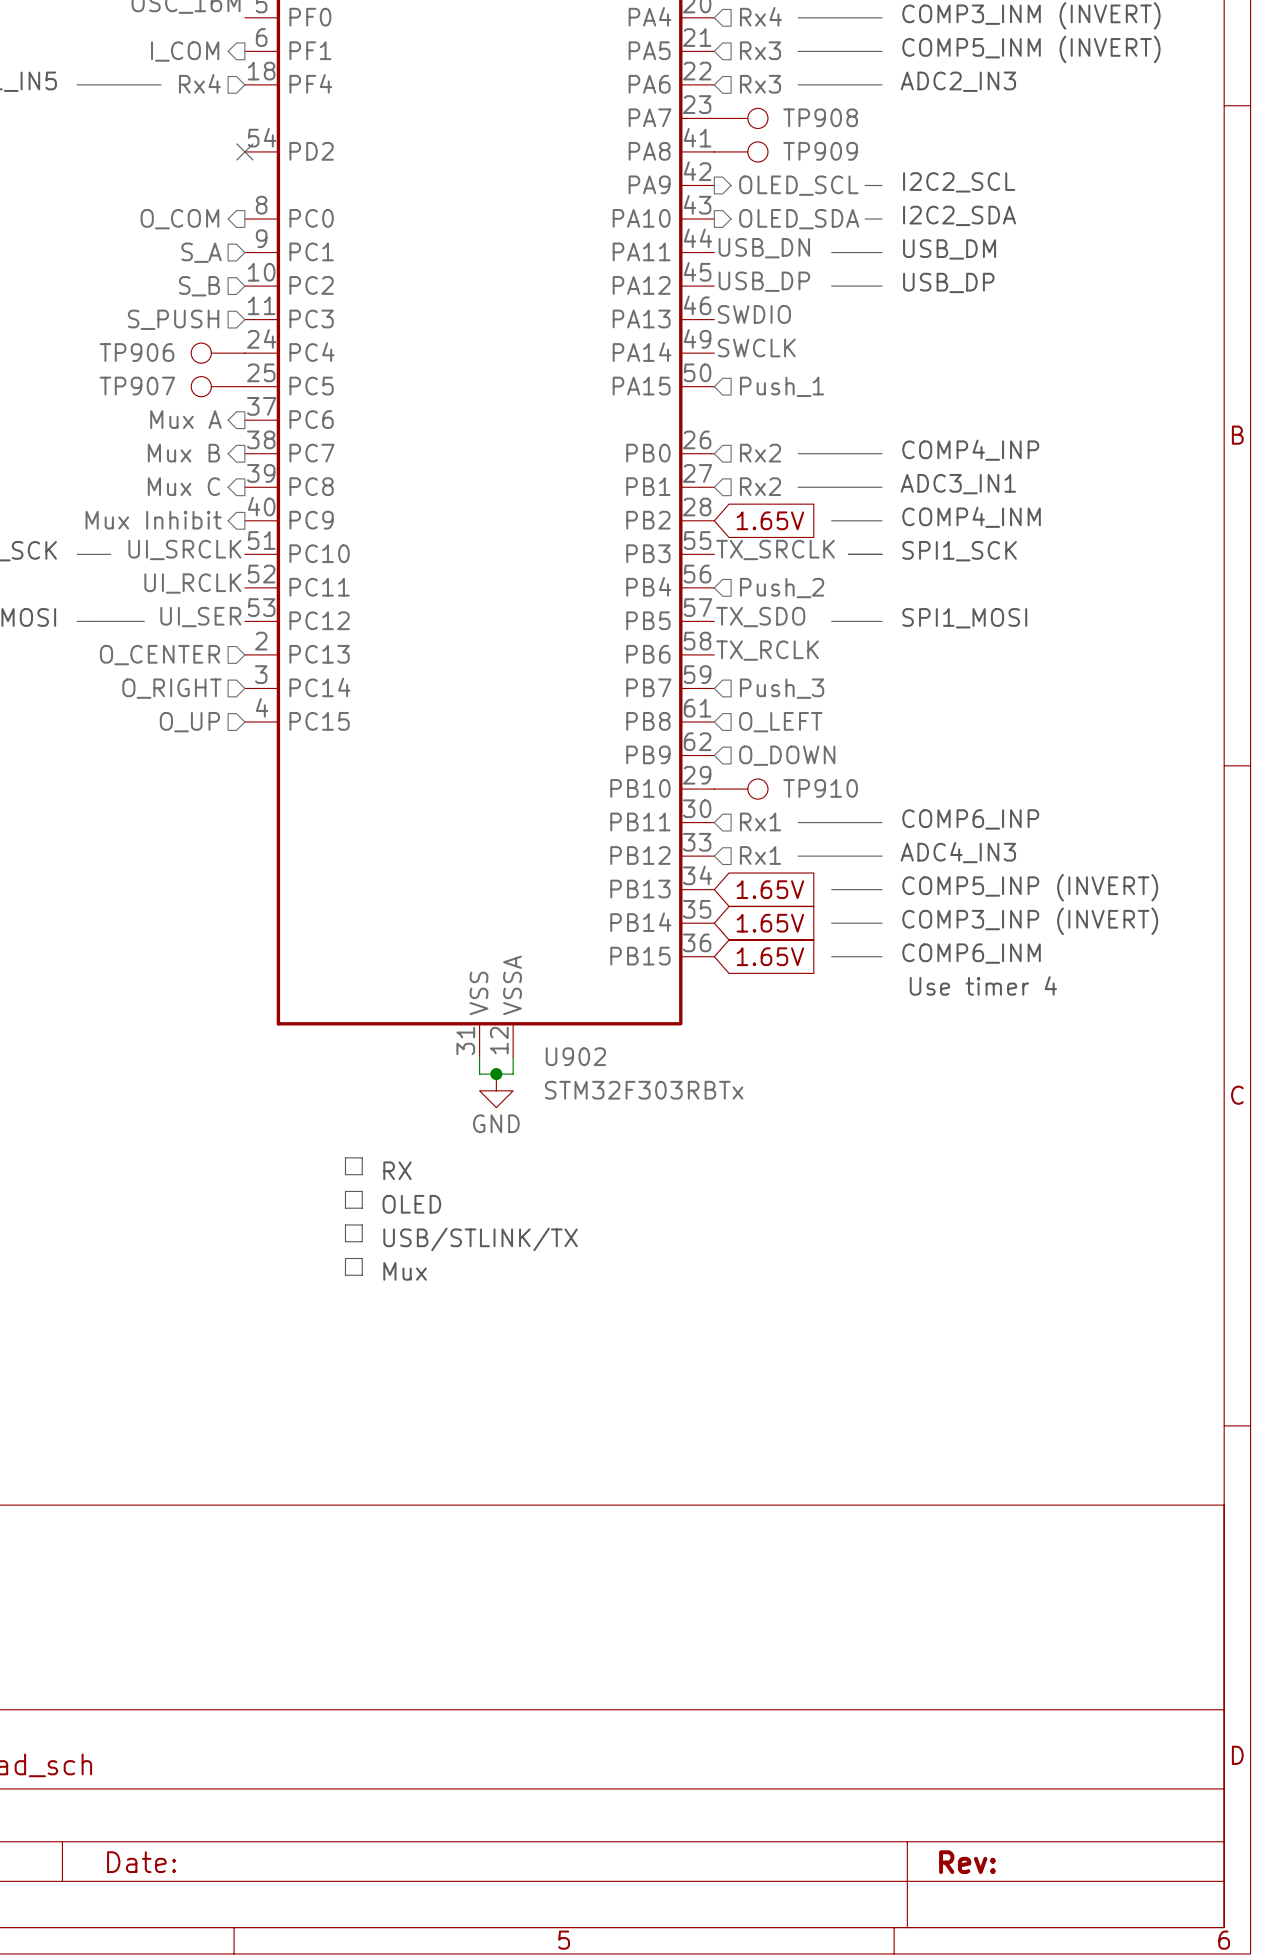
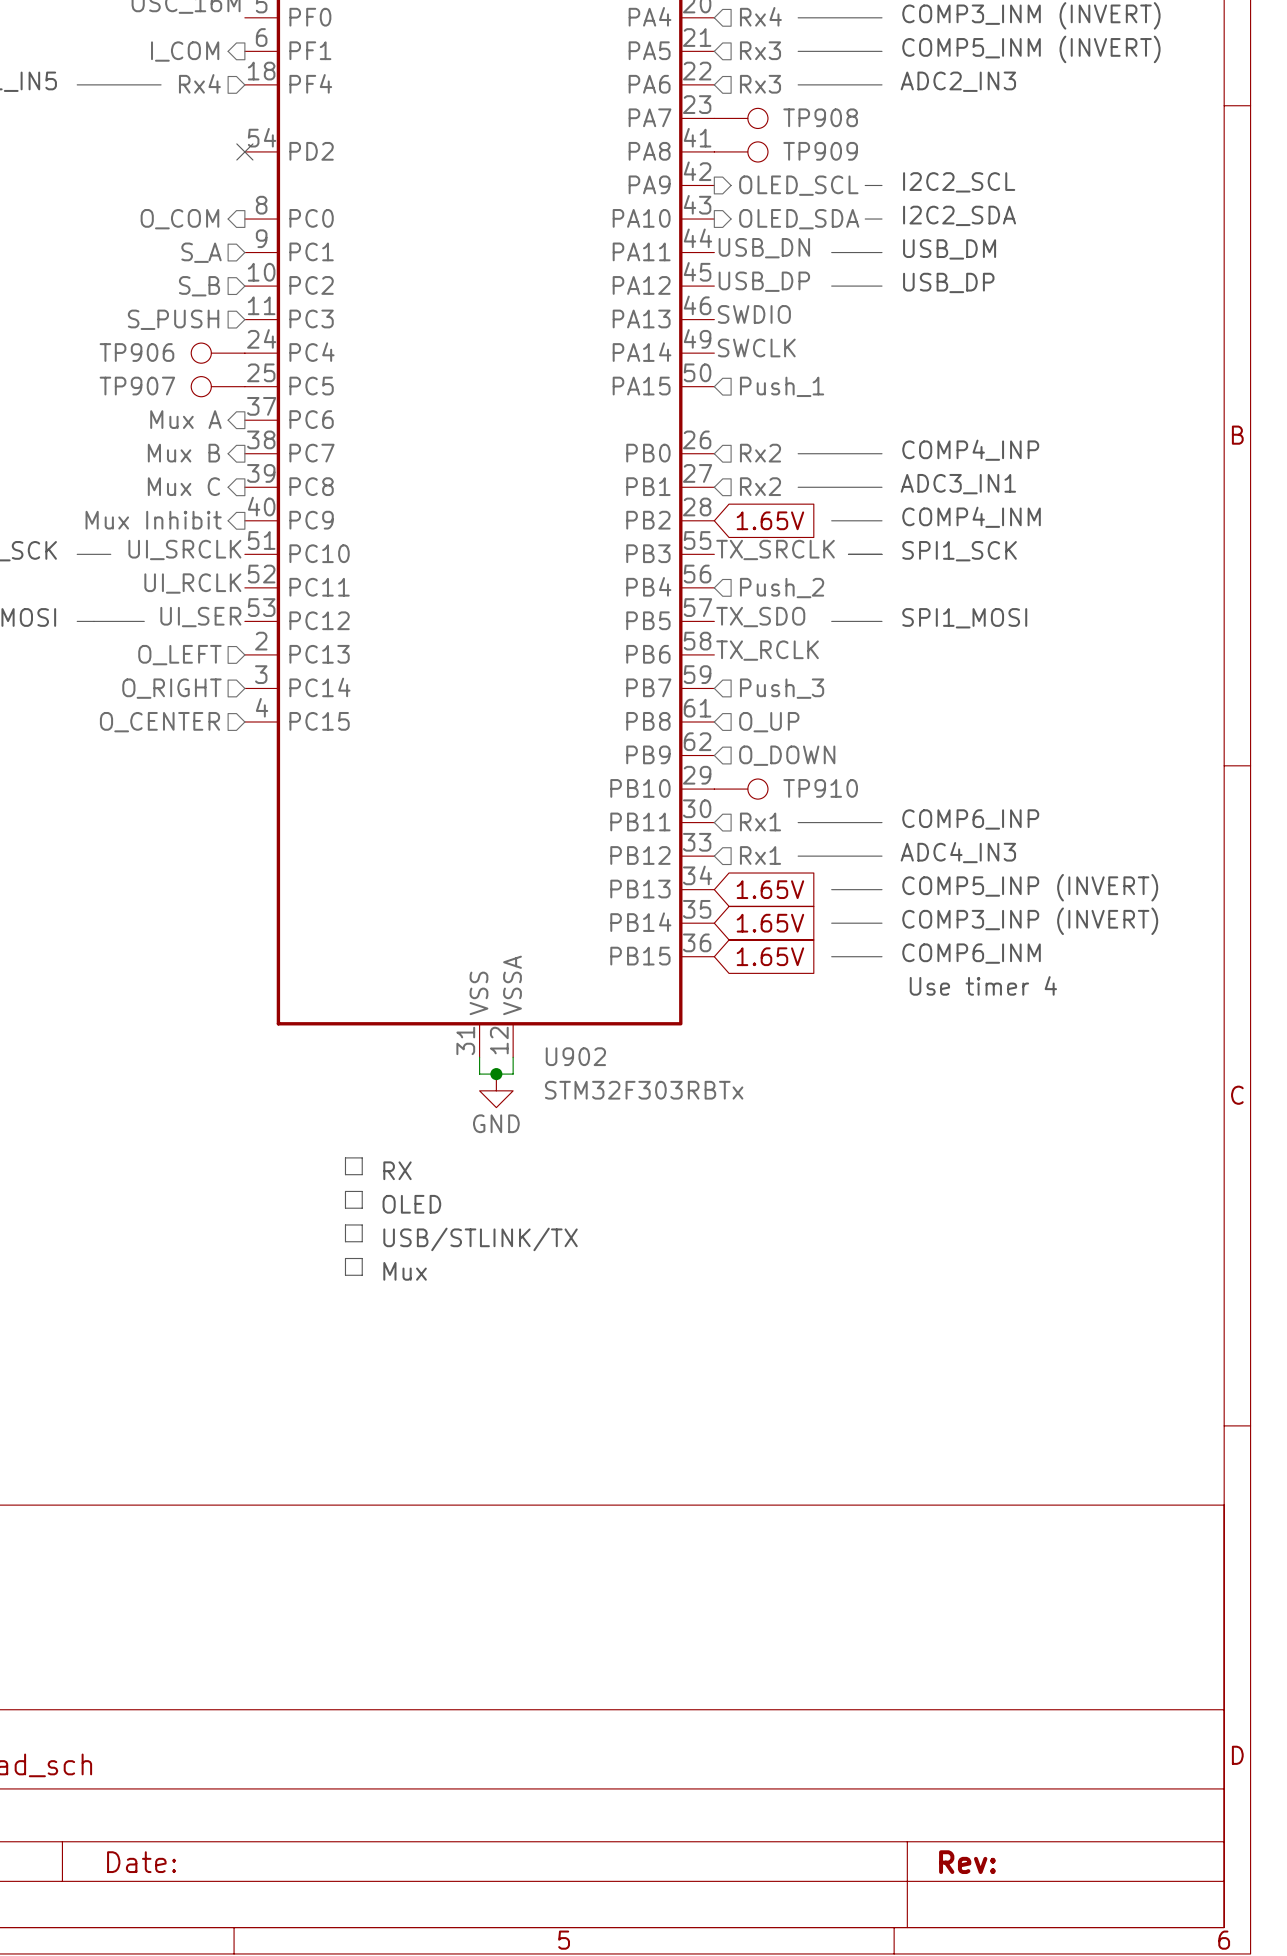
hierarchical label: O_CENTER (159, 655) -> O_LEFT (179, 655)
hierarchical label: O_UP (189, 722) -> O_CENTER (159, 722)
hierarchical label: O_LEFT (780, 722) -> O_UP (769, 722)

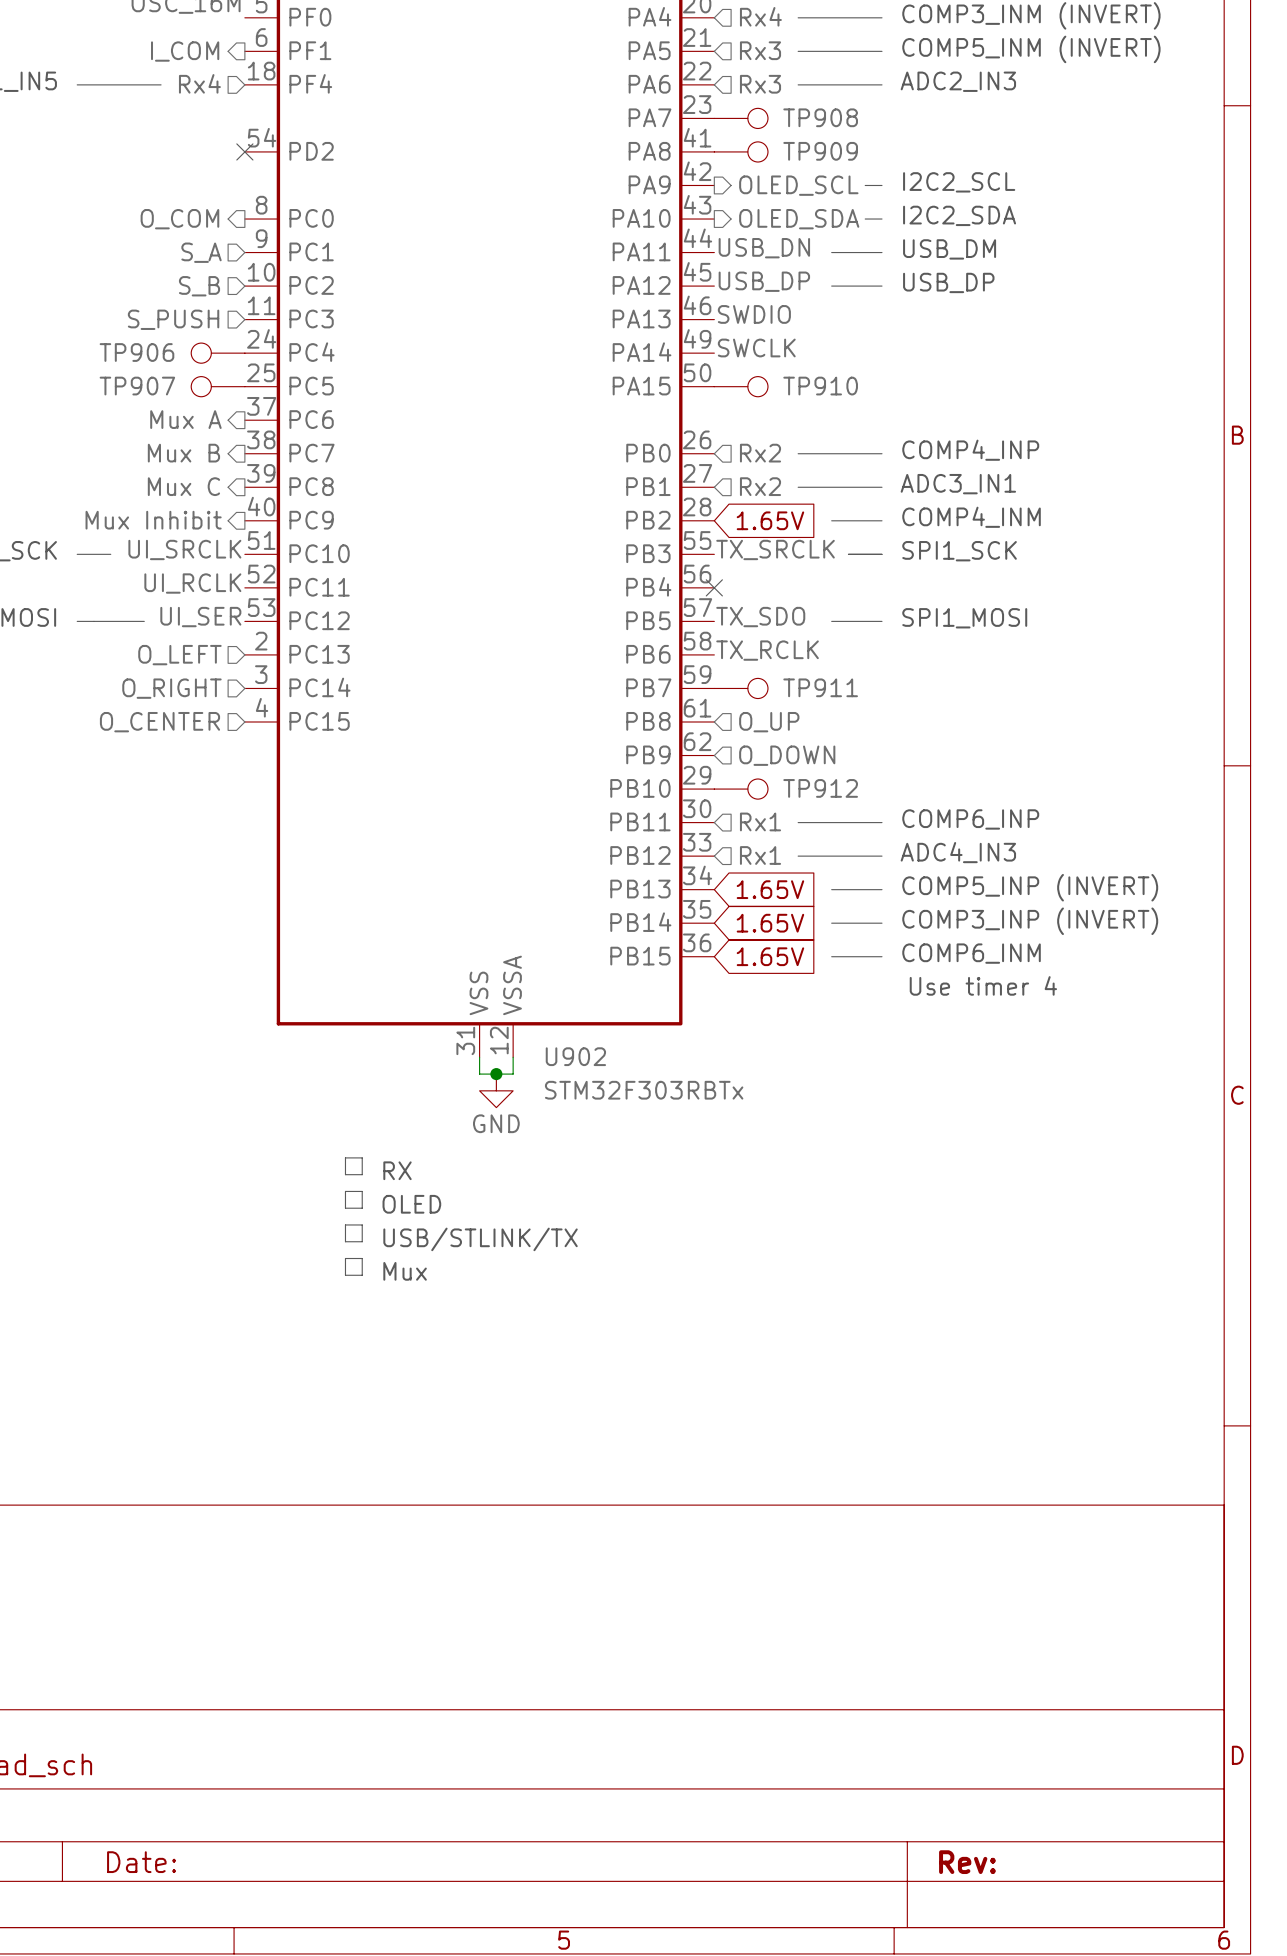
TP910: none -> (741, 386)
hierarchical label: Push_1 (782, 386) -> none
no-connect mark: none -> (714, 587)
hierarchical label: Push_2 (782, 588) -> none
TP911: none -> (741, 688)
hierarchical label: Push_3 (782, 688) -> none
TP910 name: TP910 (820, 788) -> TP912 (820, 788)

